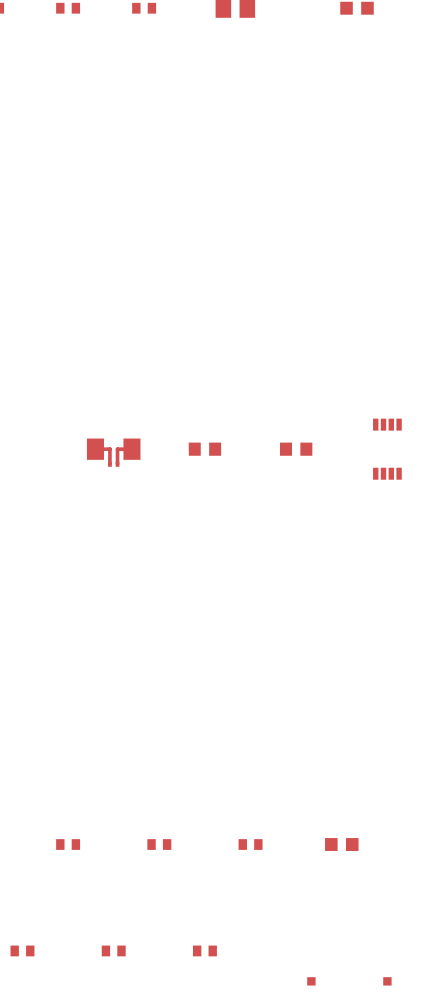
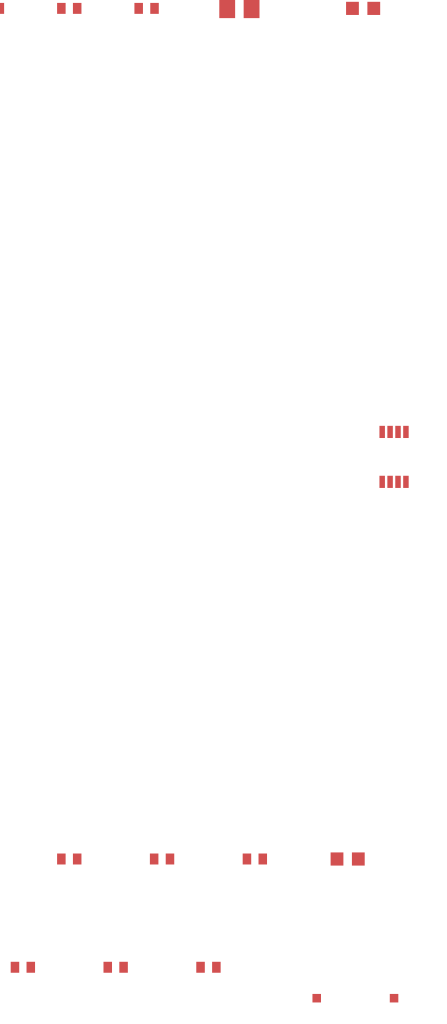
part: (204, 449) -> none
part: (296, 449) -> none
part: (113, 452) -> none

